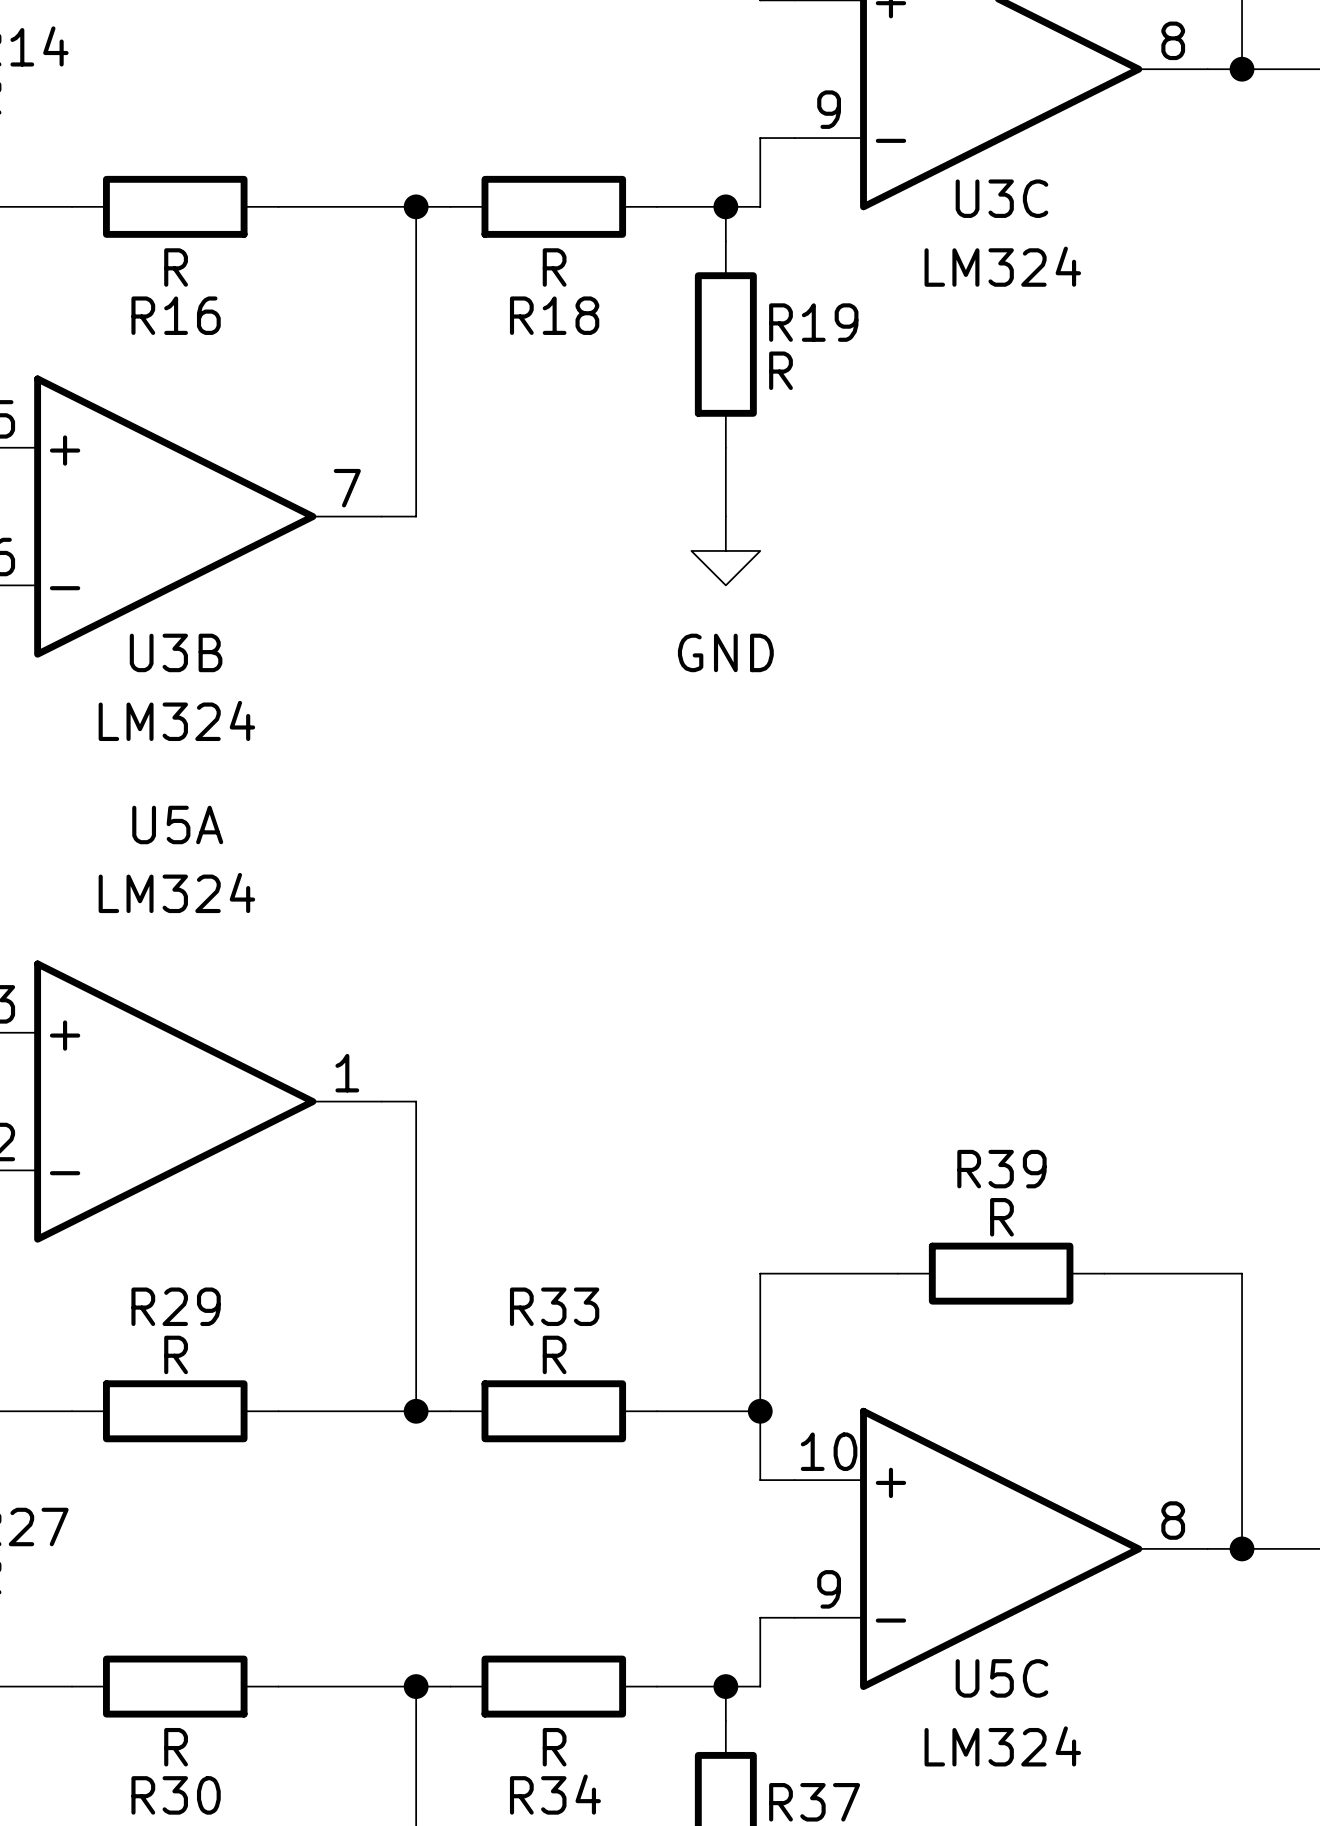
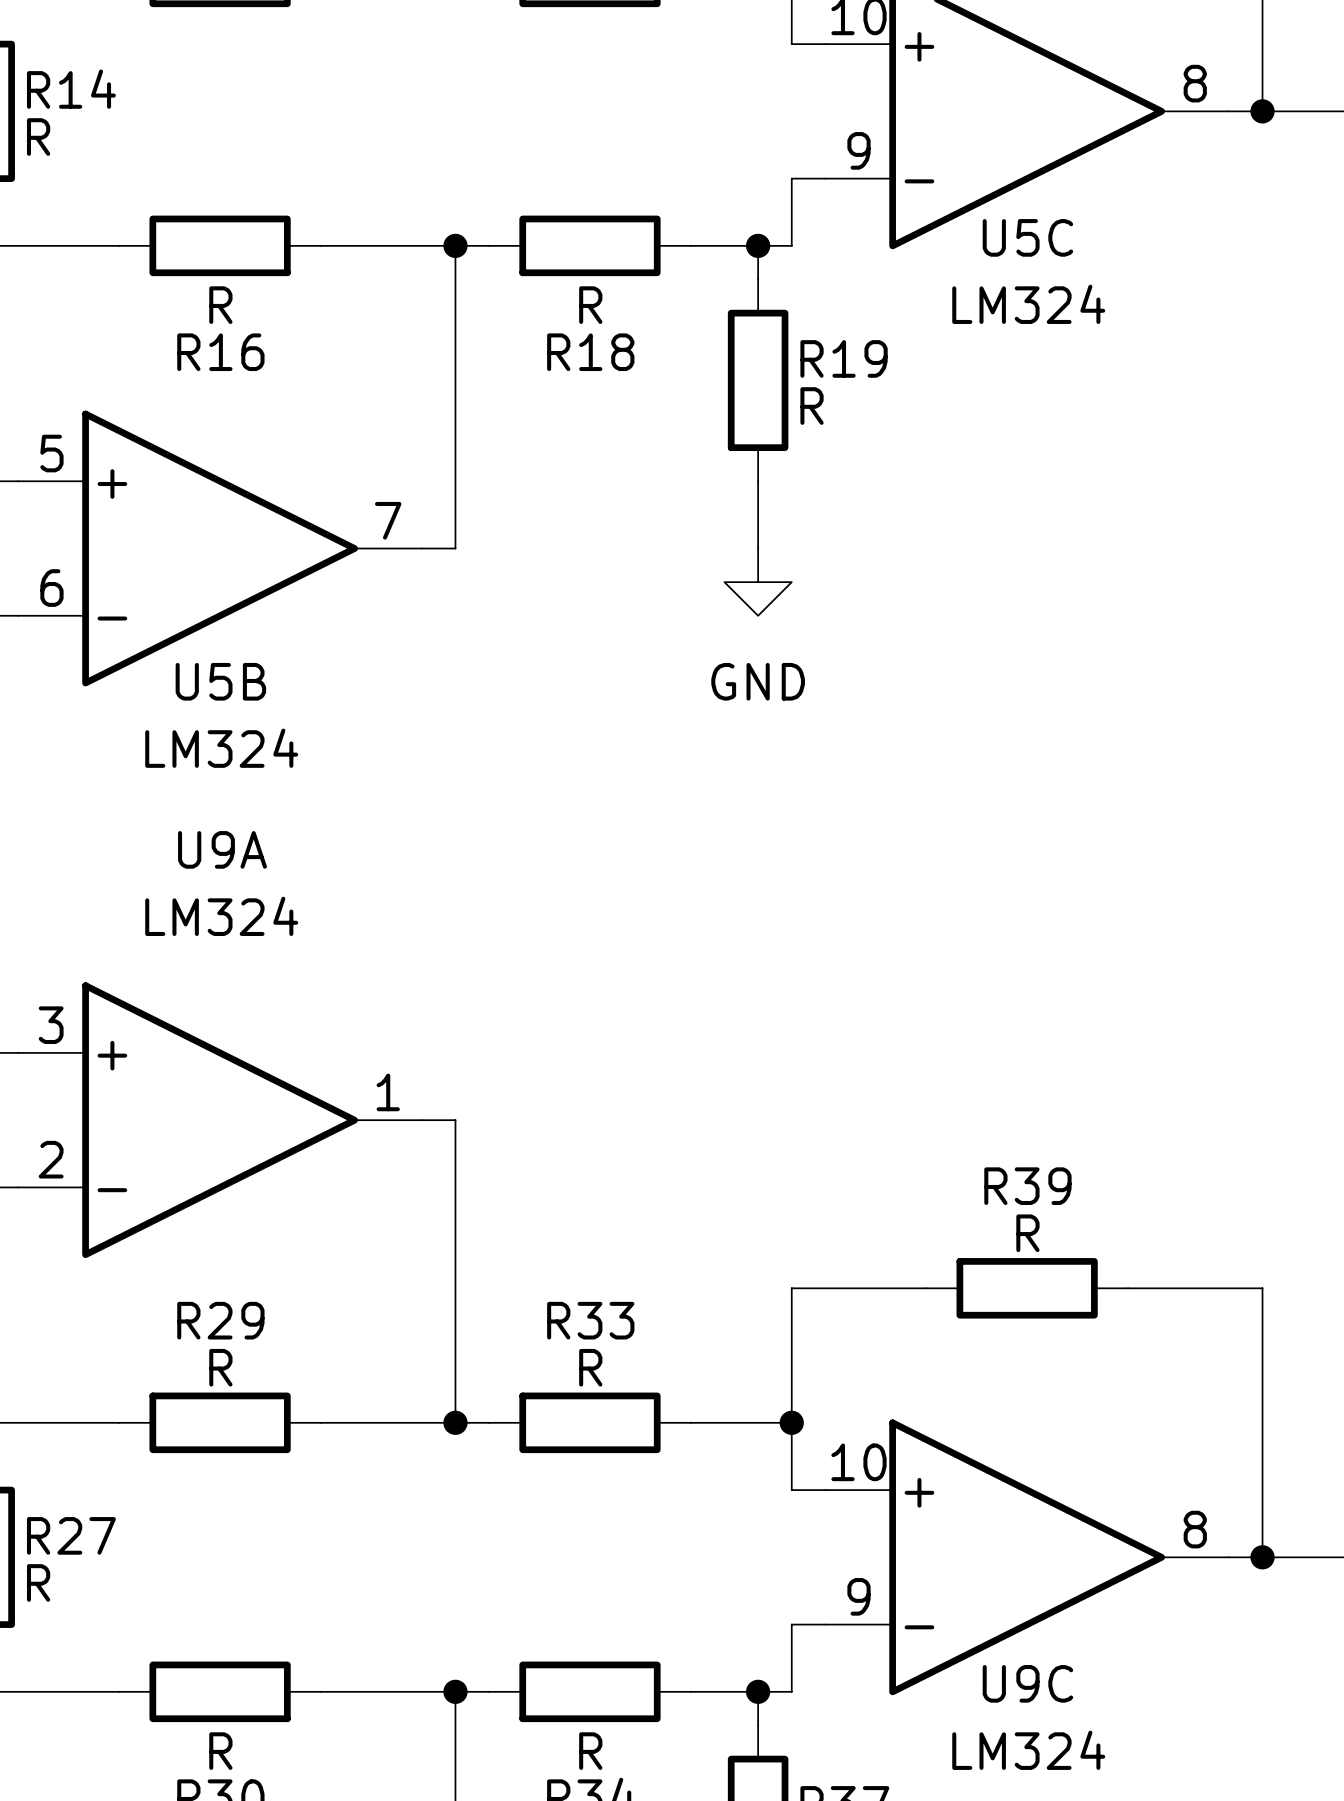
U3C name: U3C (1001, 198) -> U5C (1027, 237)
U3B name: U3B (176, 652) -> U5B (220, 681)
U5A name: U5A (177, 824) -> U9A (222, 849)
U5C name: U5C (1001, 1678) -> U9C (1027, 1683)

